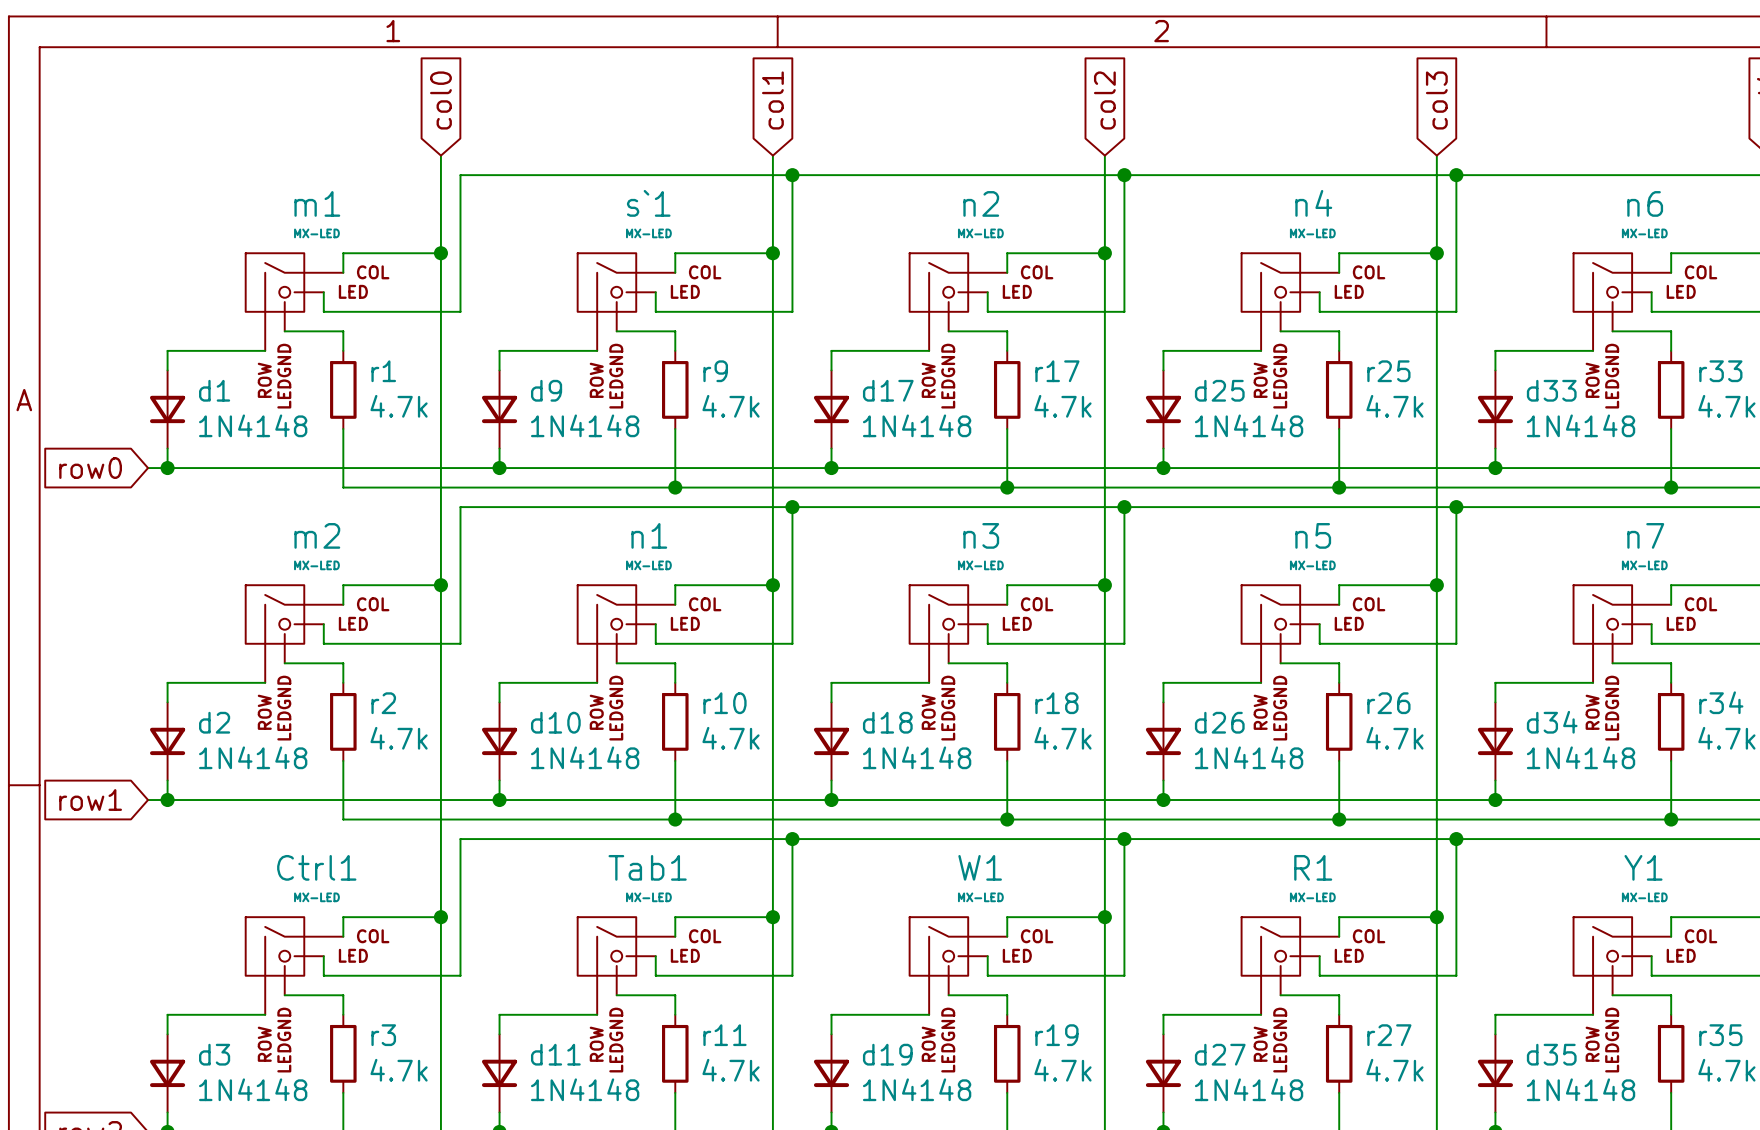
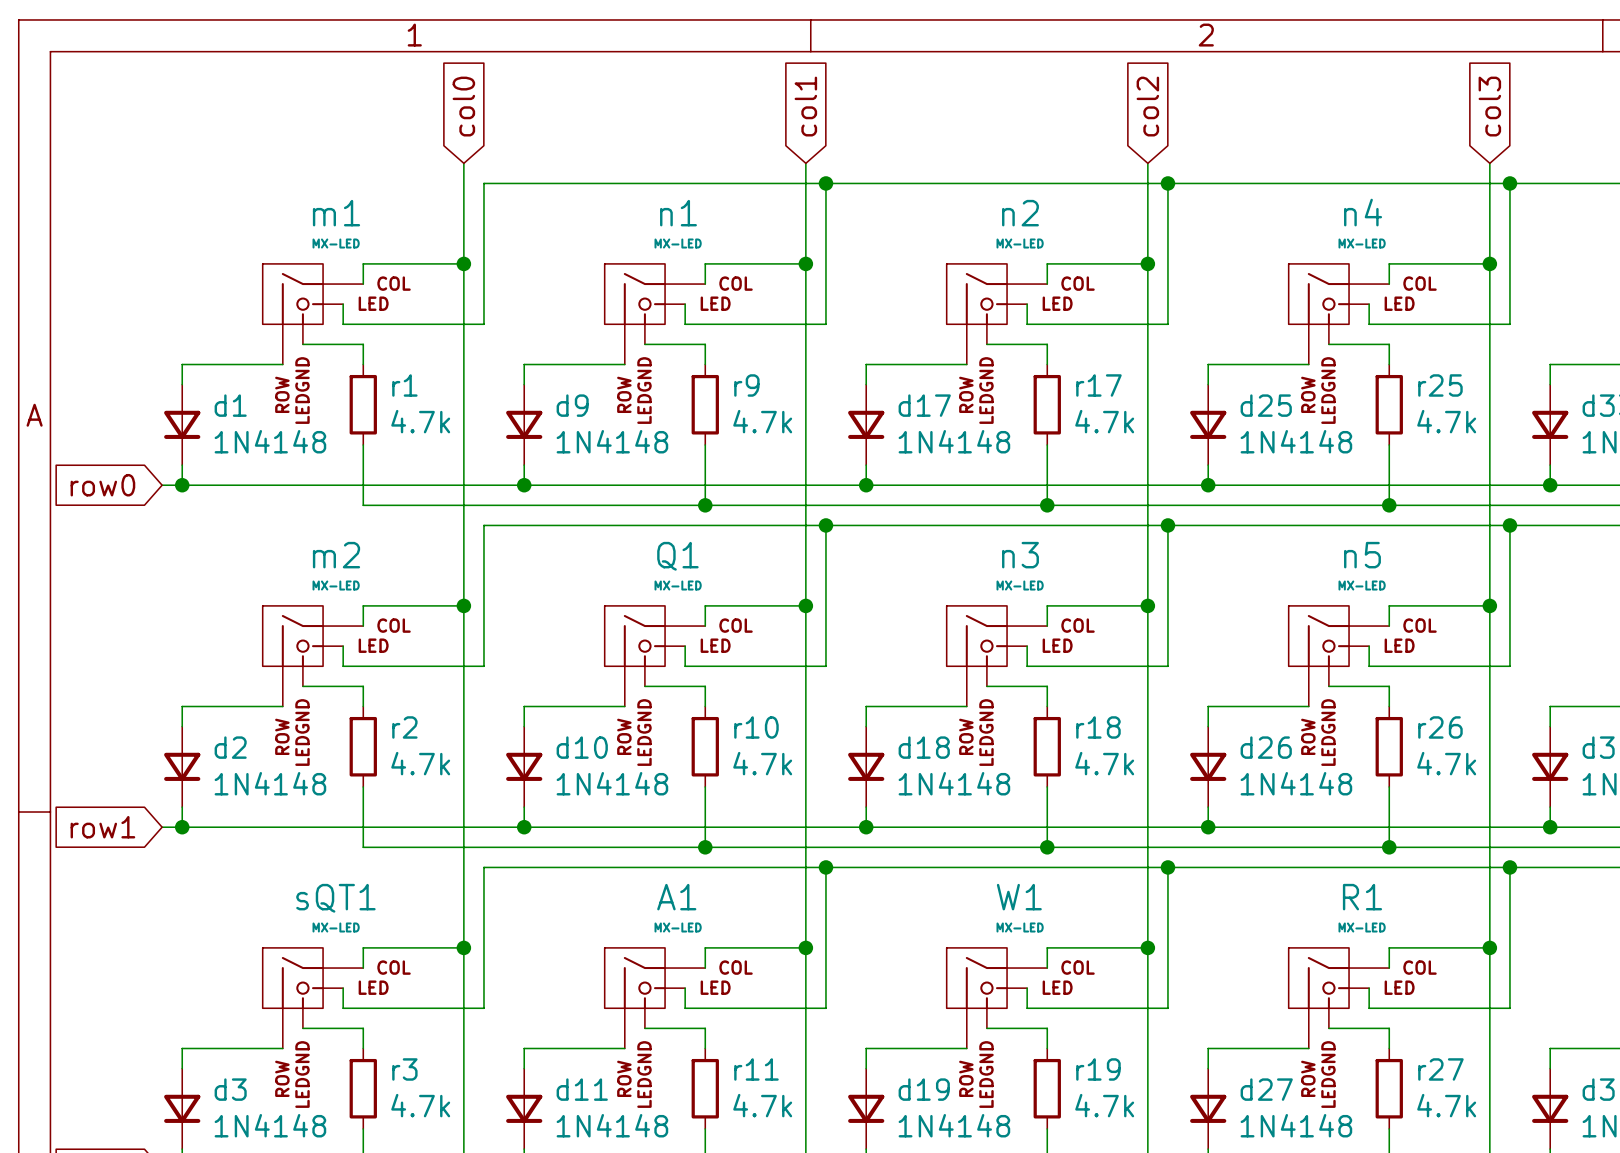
s`1 name: s`1 (648, 203) -> n1 (678, 213)
n1 name: n1 (649, 535) -> Q1 (677, 556)
Ctrl1 name: Ctrl1 (316, 867) -> sQT1 (335, 898)
Tab1 name: Tab1 (647, 867) -> A1 (676, 897)

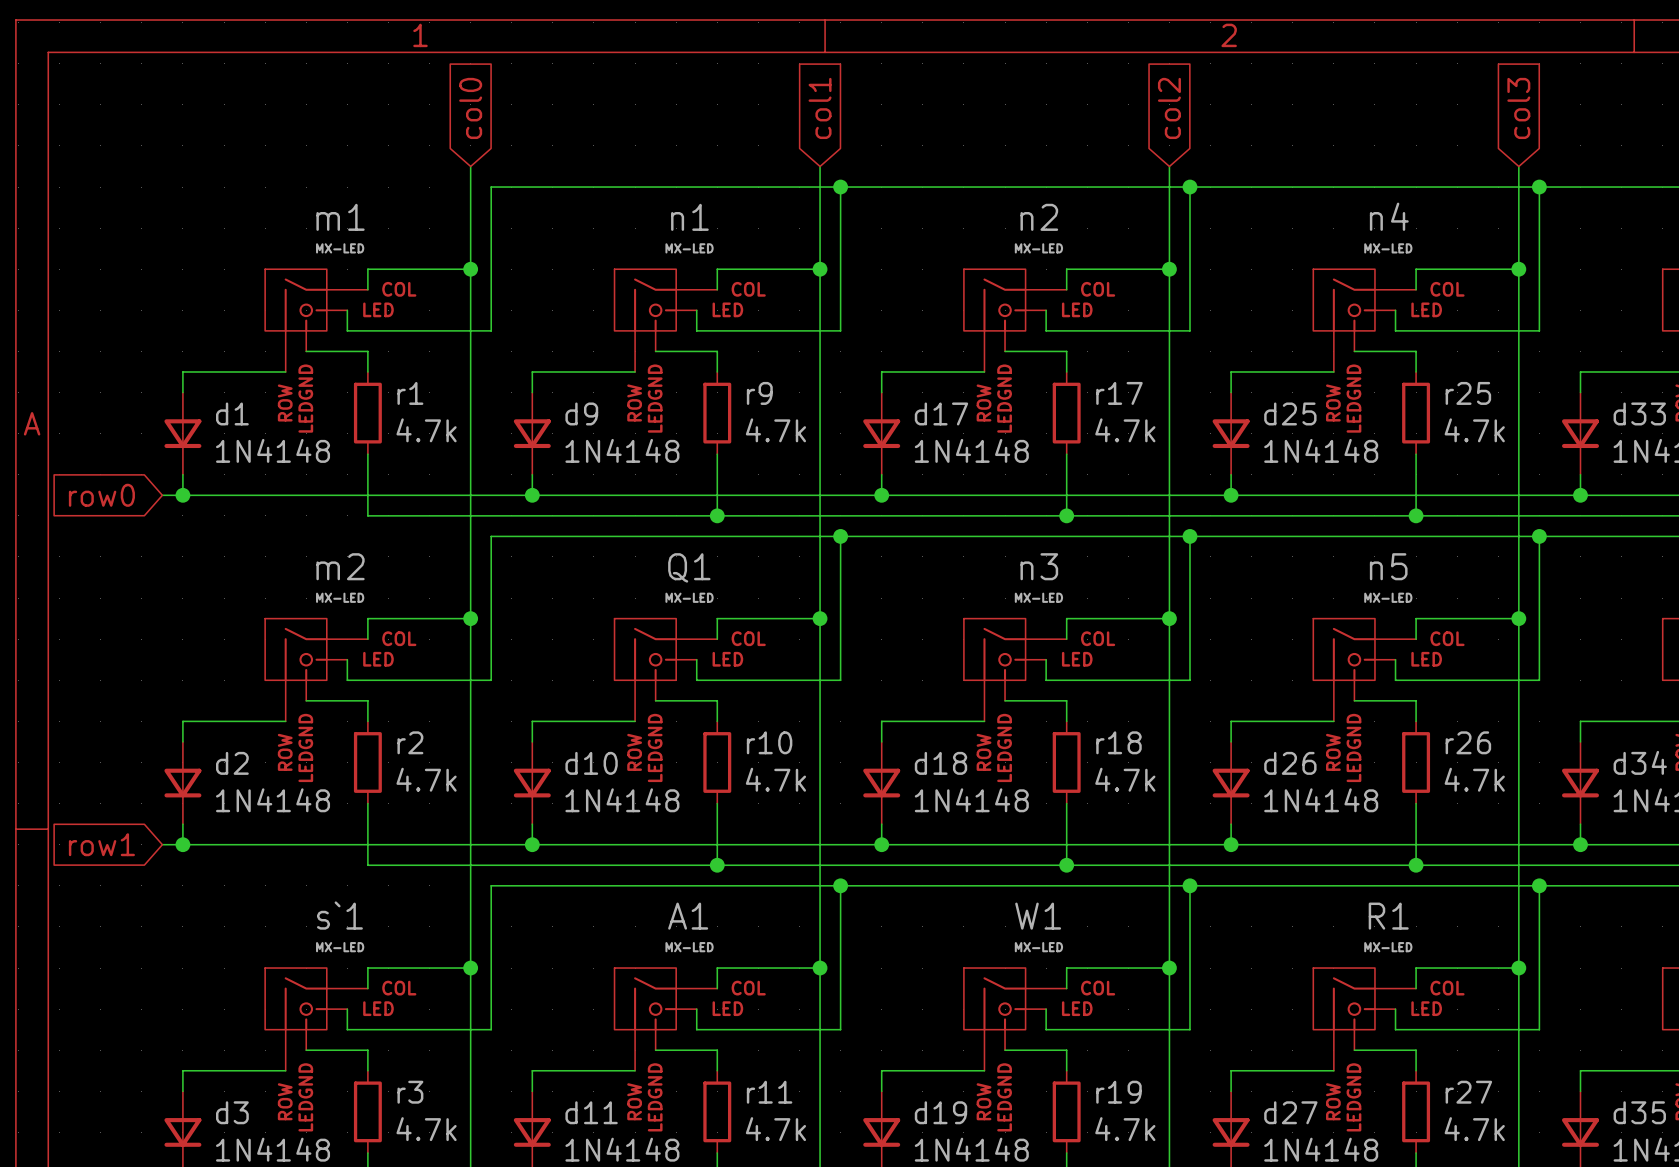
sQT1 name: sQT1 (335, 898) -> s`1 (339, 915)

